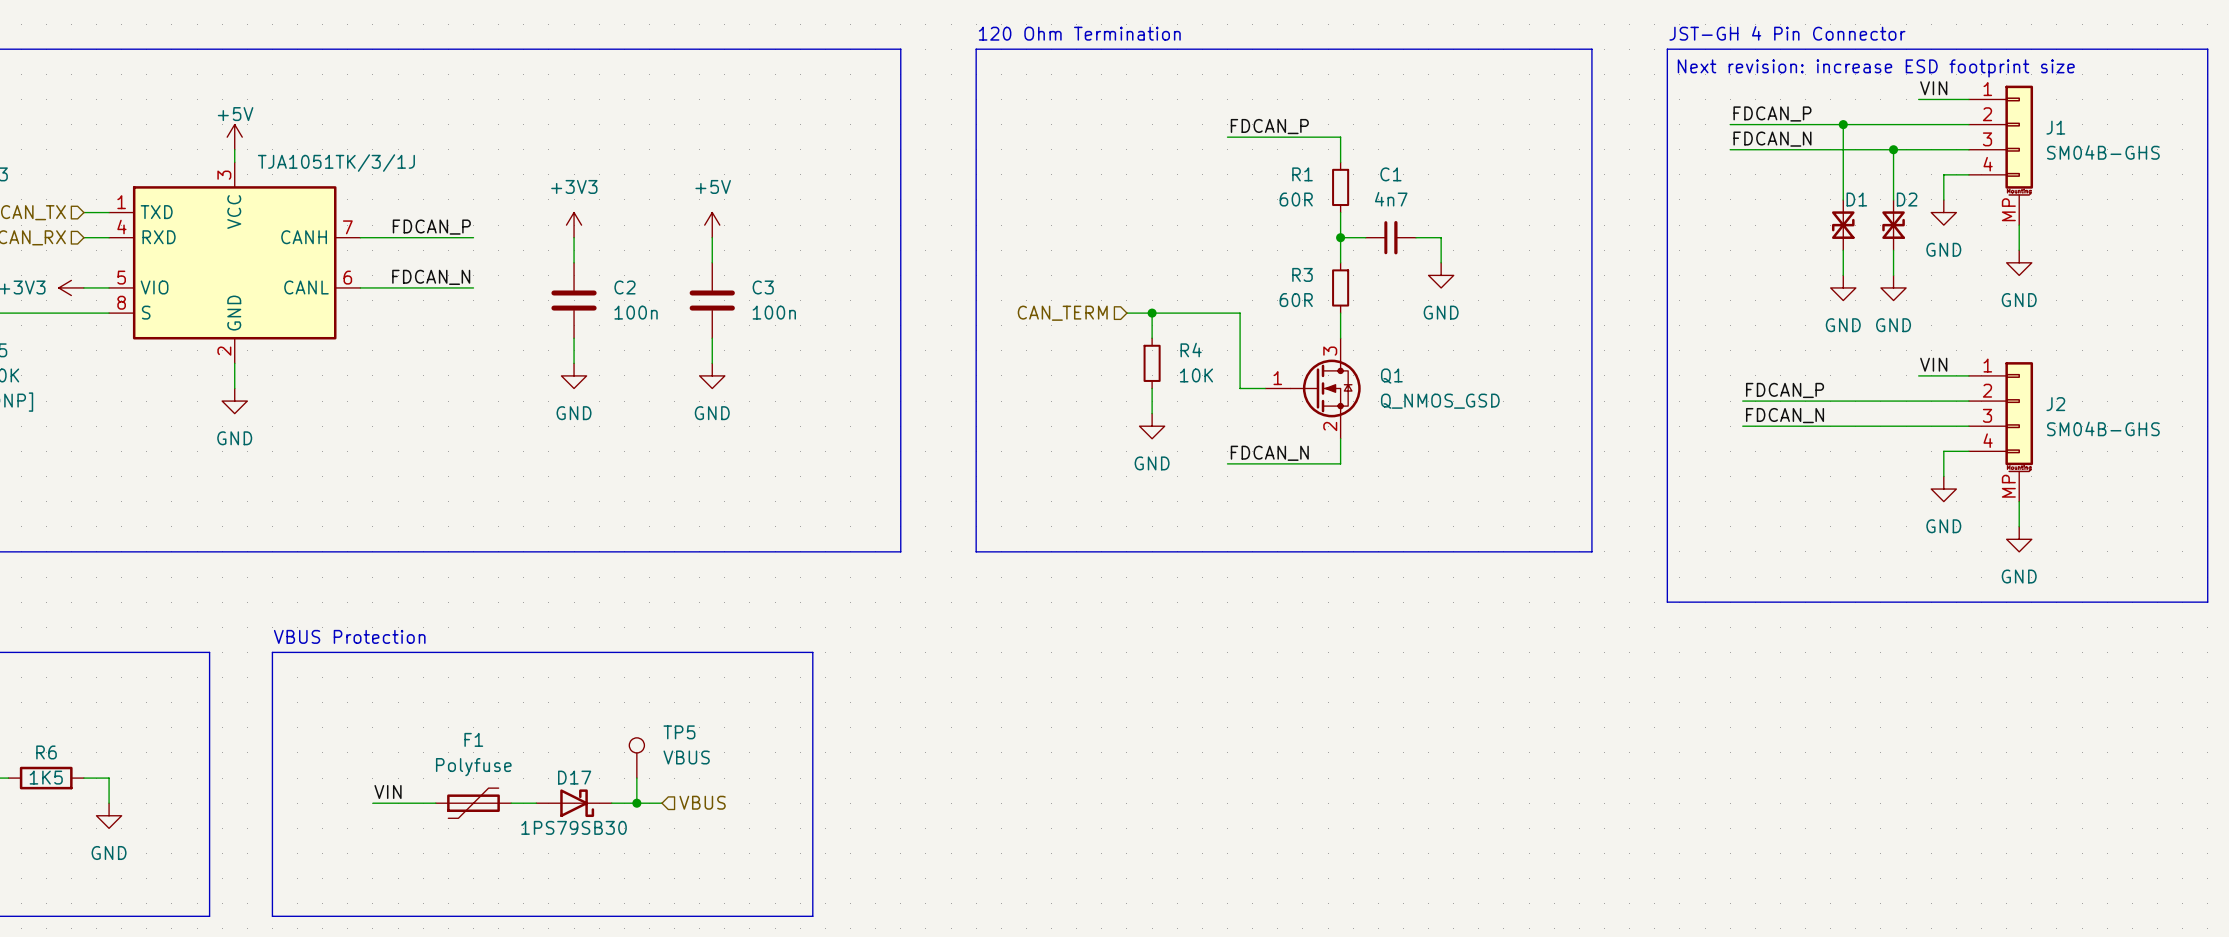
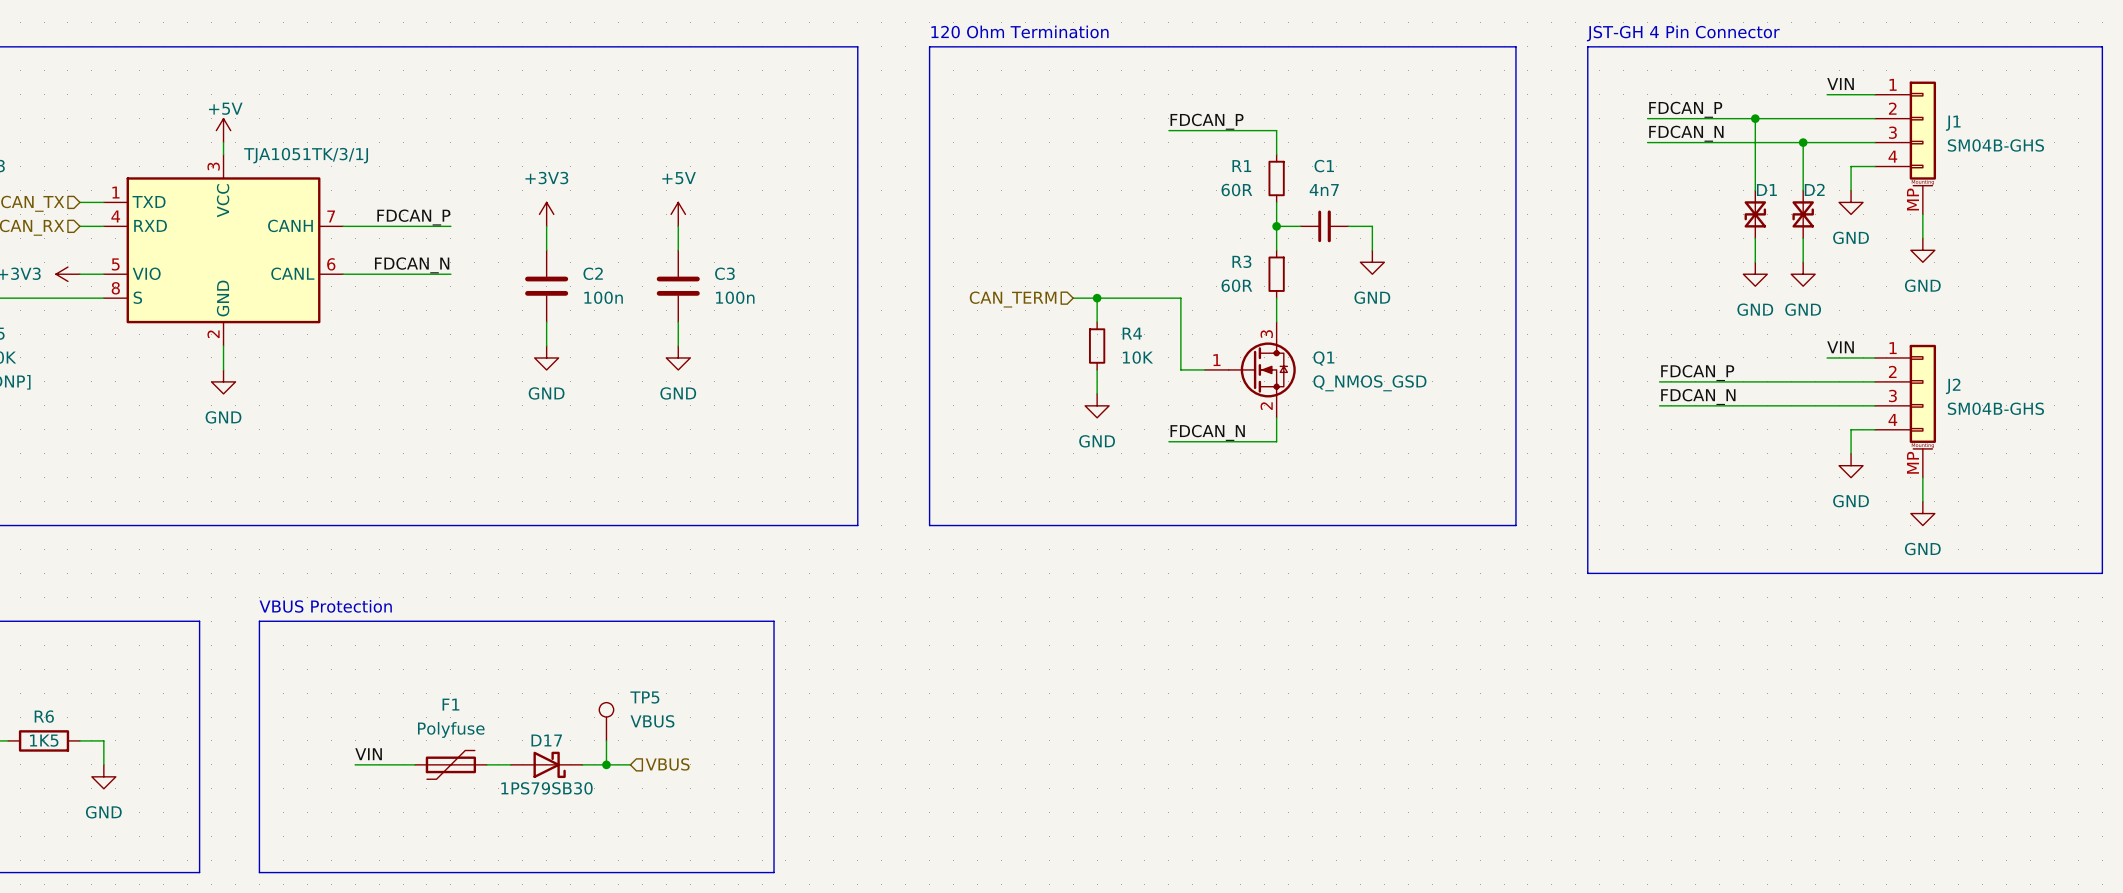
text: Next revision: increase ESD footprint size (1876, 68) -> none

